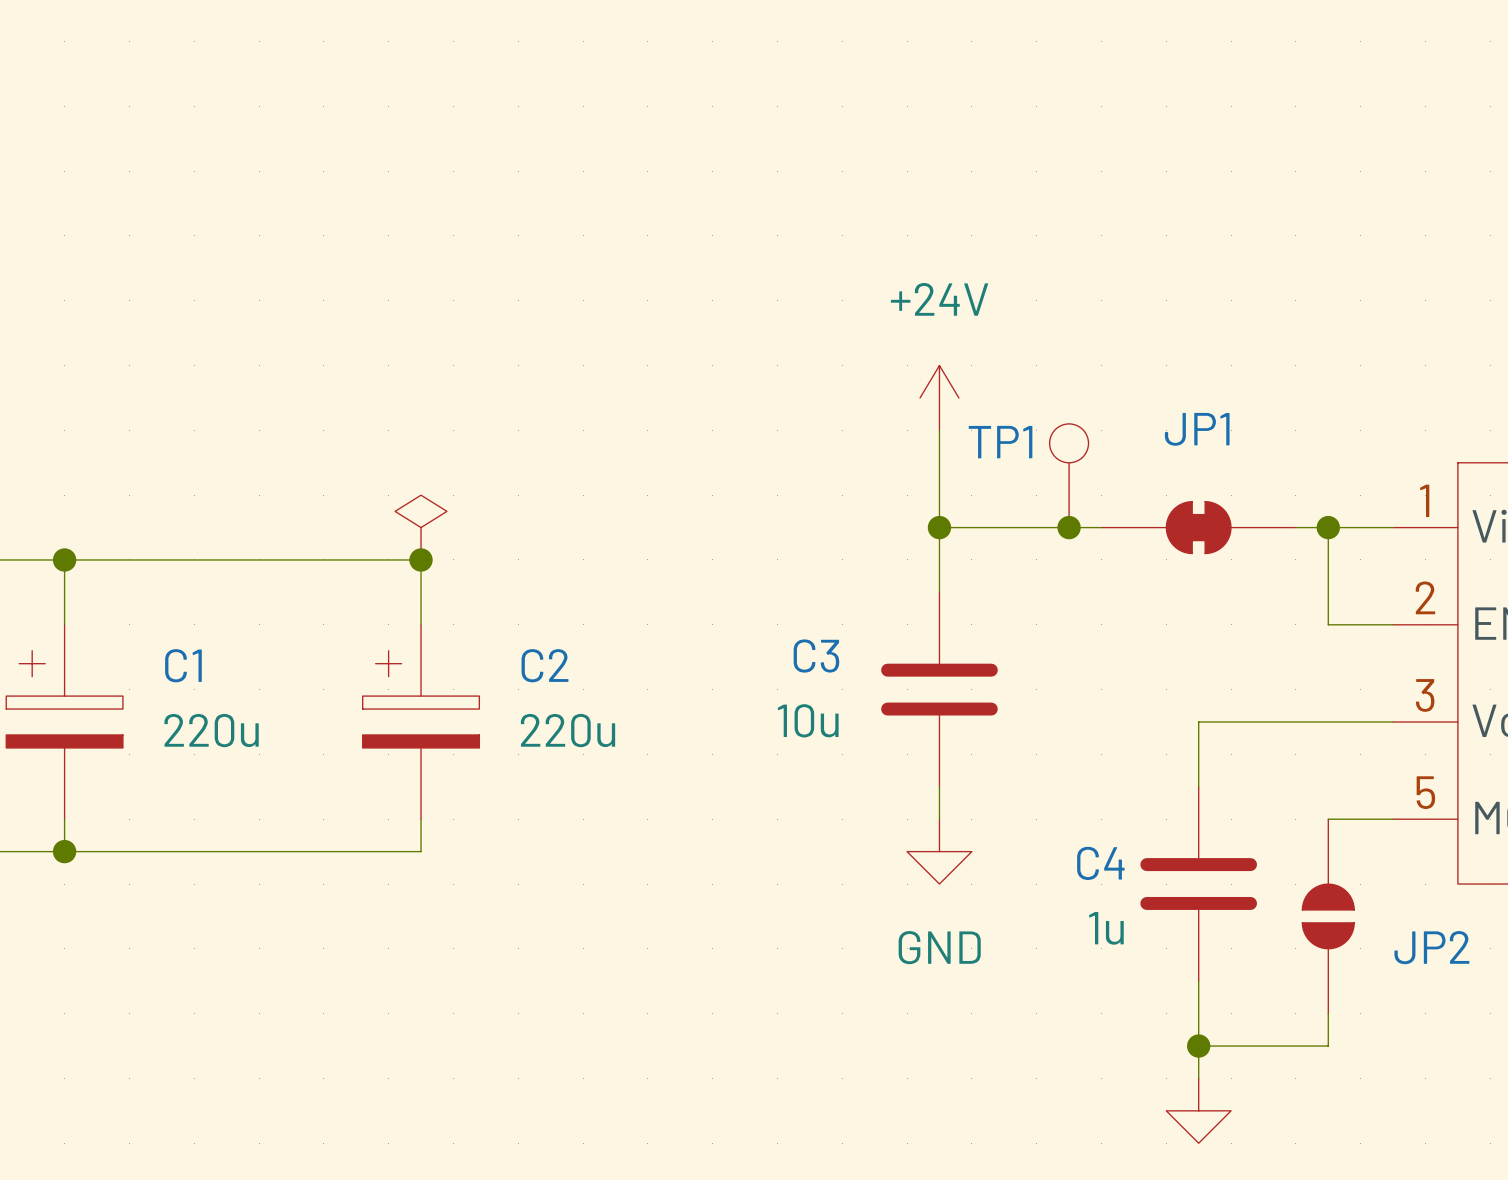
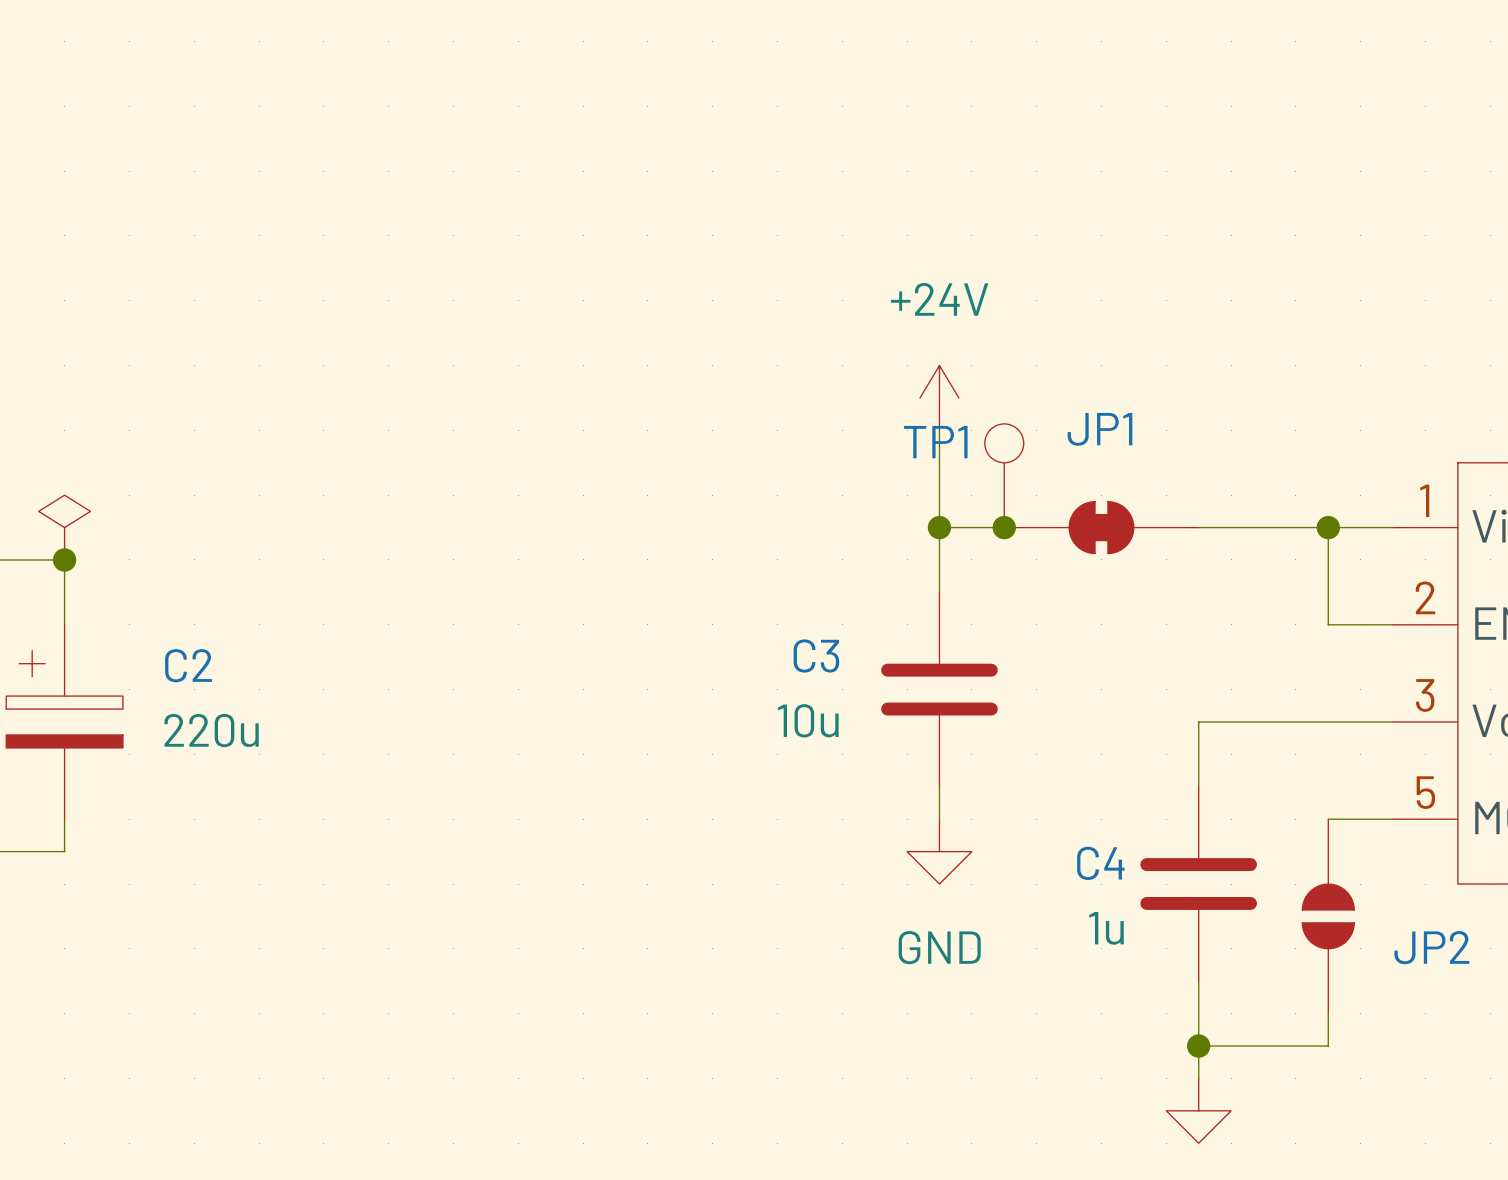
TP1 position: (1069, 475) -> (1004, 475)
power symbol position: (421, 527) -> (64, 527)
junction position: (1069, 527) -> (1004, 527)
JP1 position: (1198, 527) -> (1101, 527)
wire: (64, 559) (421, 559) (421, 624) -> none
junction: (421, 559) -> none
C1 name: C1 (183, 665) -> C2 (188, 665)
C2: 220u (421, 722) -> none
wire: (421, 819) (421, 851) (64, 851) -> none
junction: (64, 851) -> none

